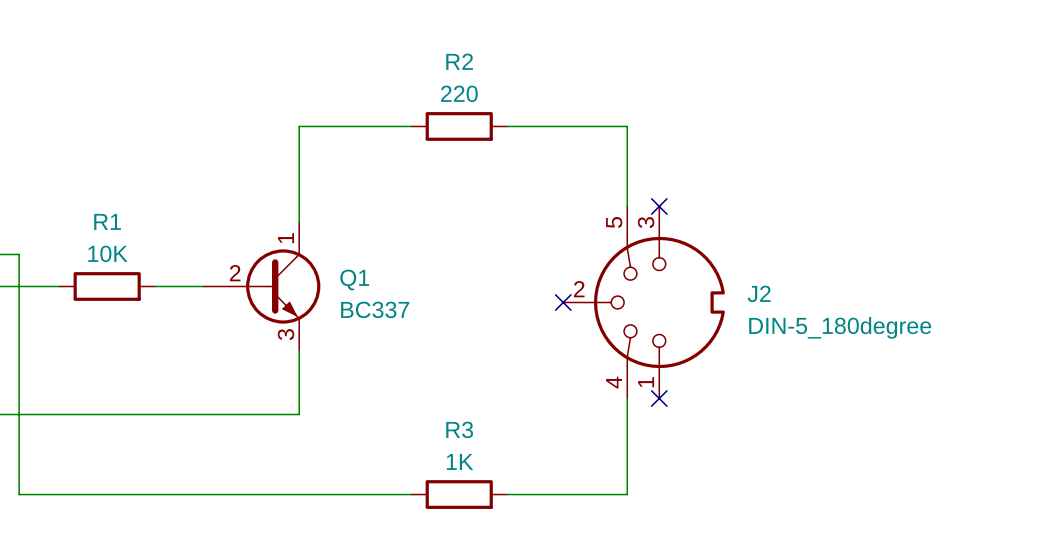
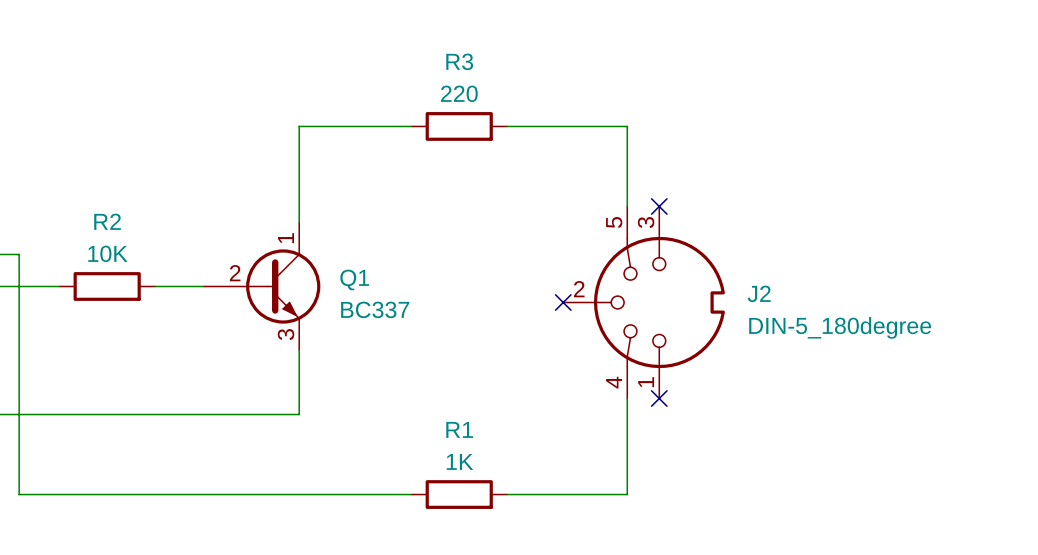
R2 name: R2 (459, 61) -> R3 (459, 61)
R1 name: R1 (107, 221) -> R2 (107, 221)
R3 name: R3 (459, 429) -> R1 (459, 429)

